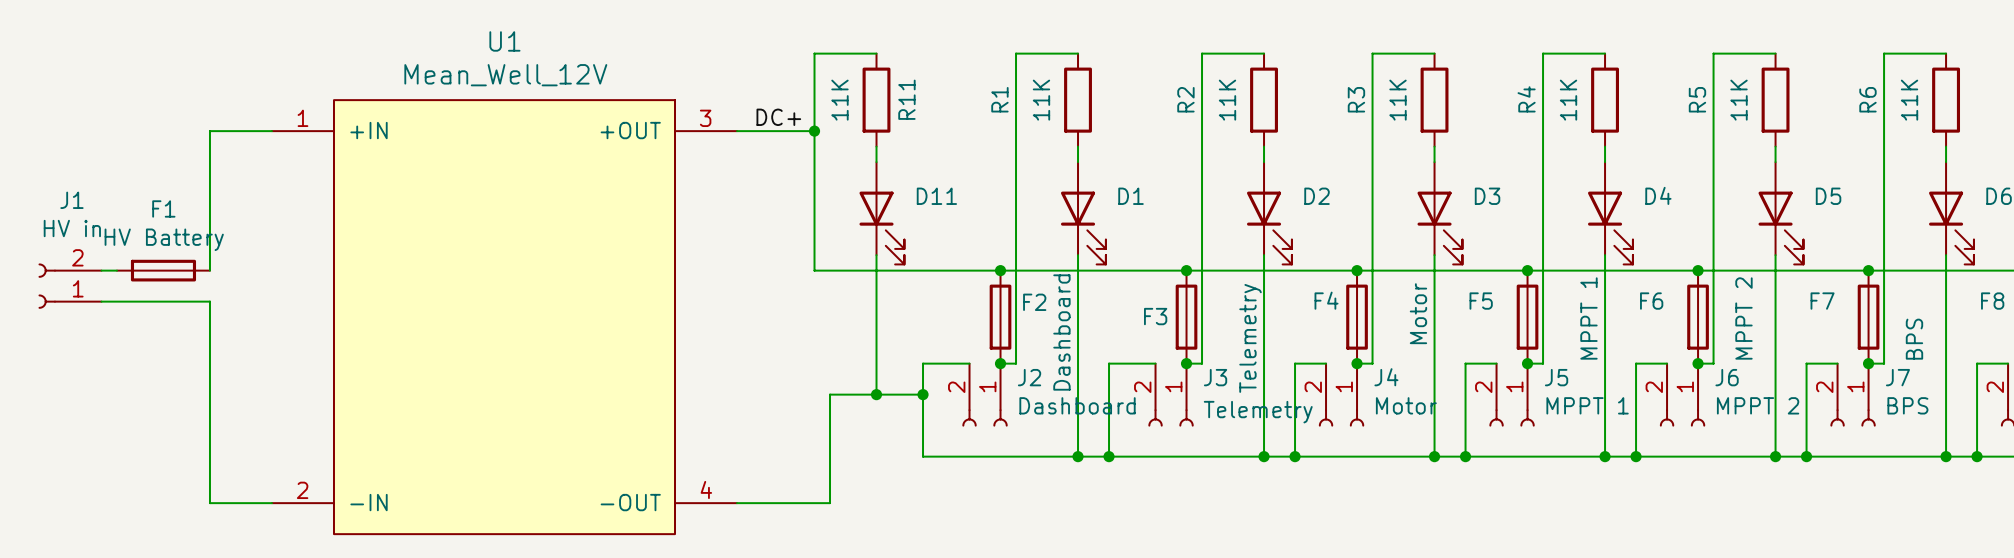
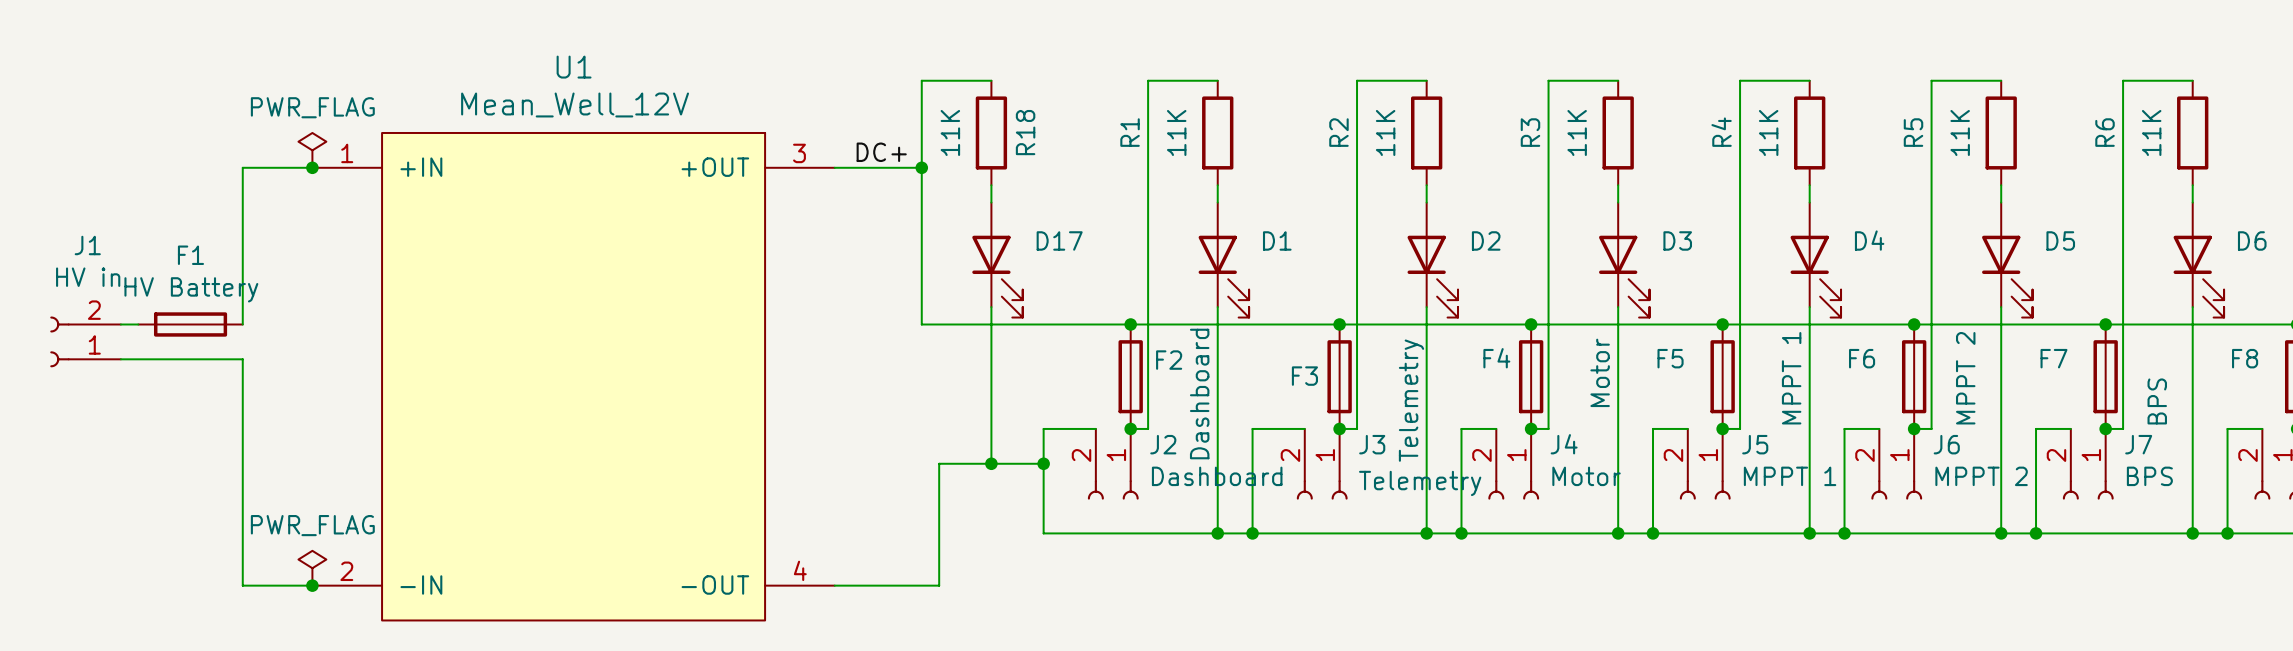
R11 name: R11 (906, 99) -> R18 (1025, 132)
power symbol: none -> PWR_FLAG (312, 150)
junction: none -> (312, 167)
D11 name: D11 (936, 196) -> D17 (1059, 240)
power symbol: none -> PWR_FLAG (312, 568)
junction: none -> (312, 585)

